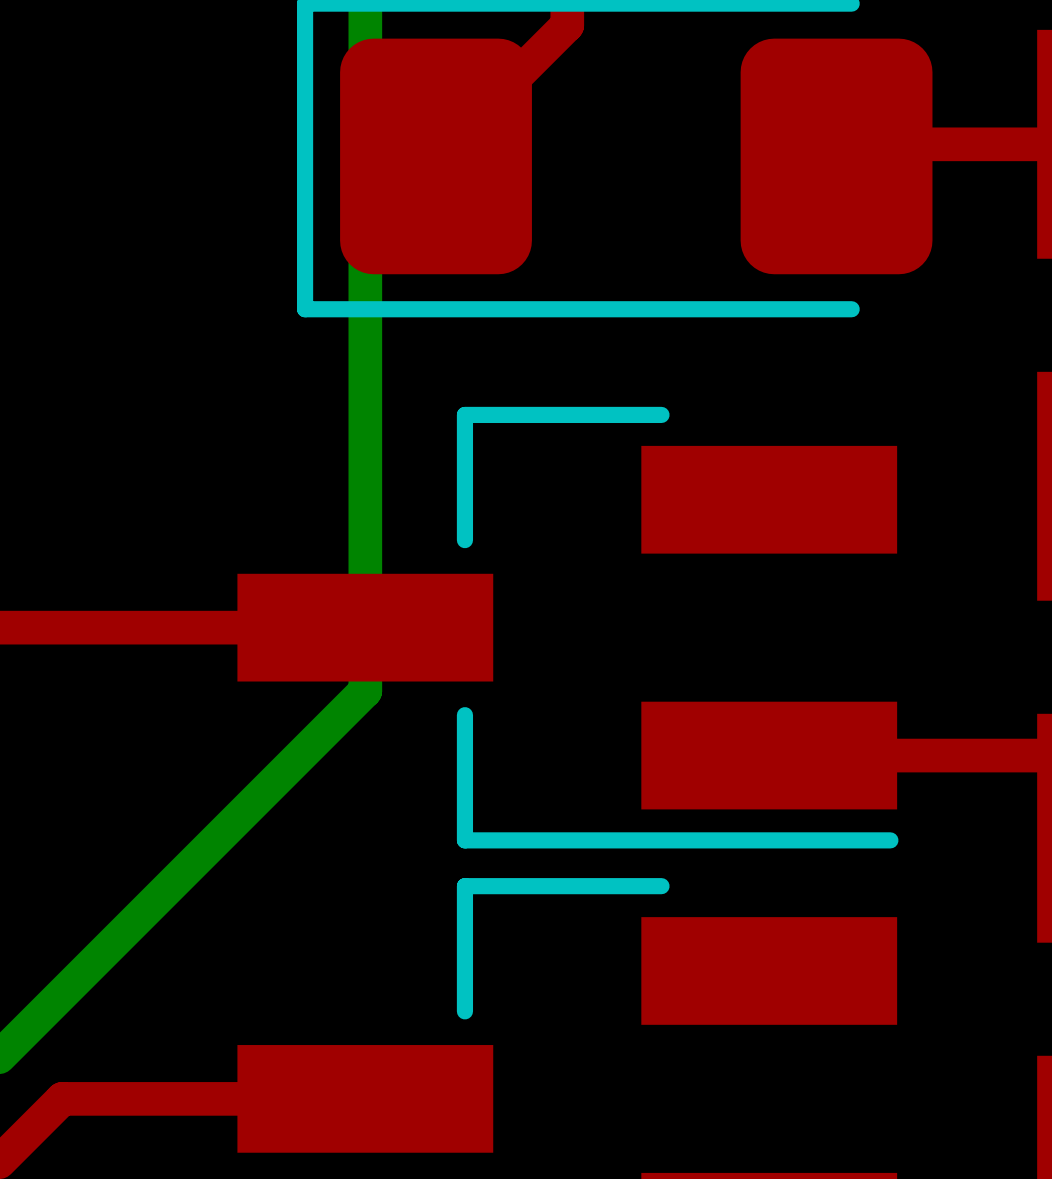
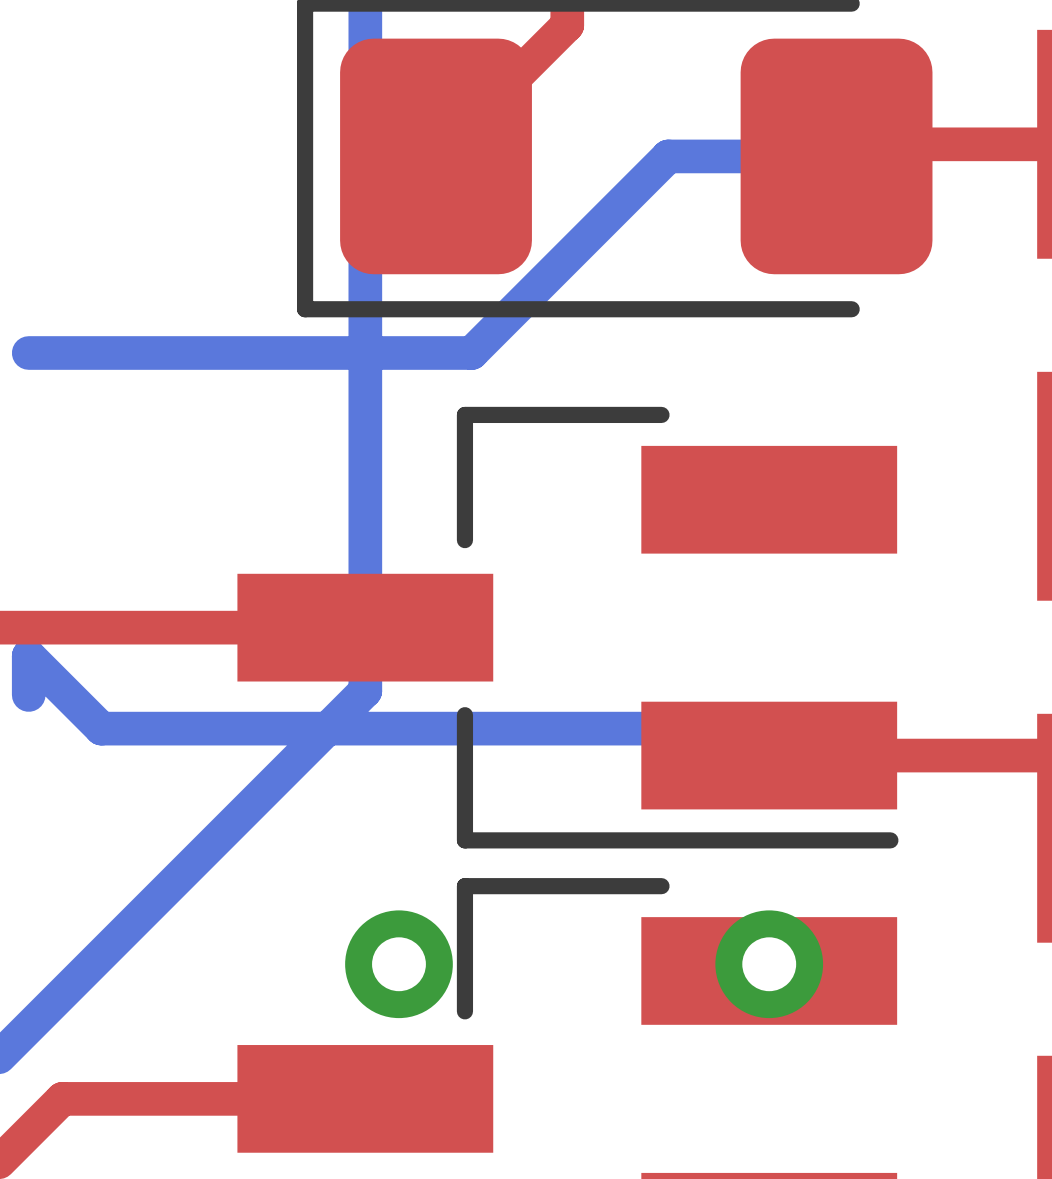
bottom track: none -> (769, 156) (668, 156) (471, 353) (28, 353)
bottom track: none -> (28, 694) (28, 655) (101, 728) (777, 728)
via: none -> (398, 964)
via: none -> (769, 964)

